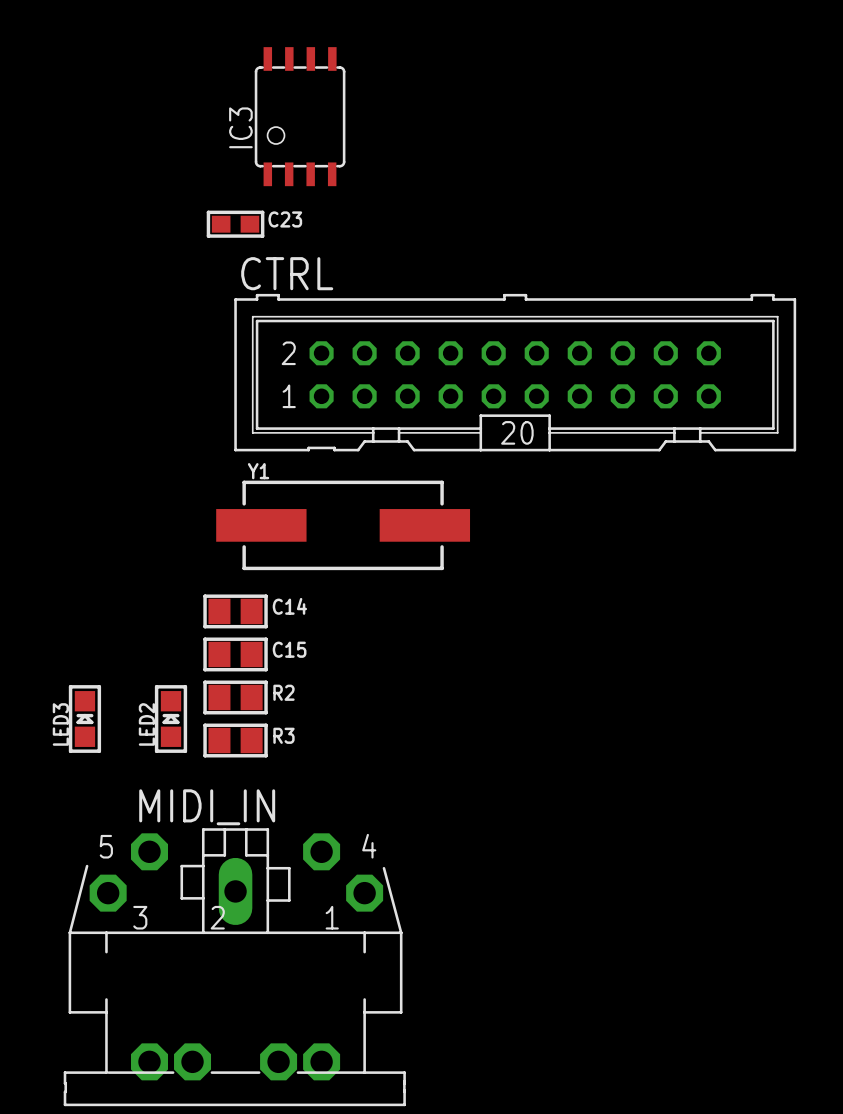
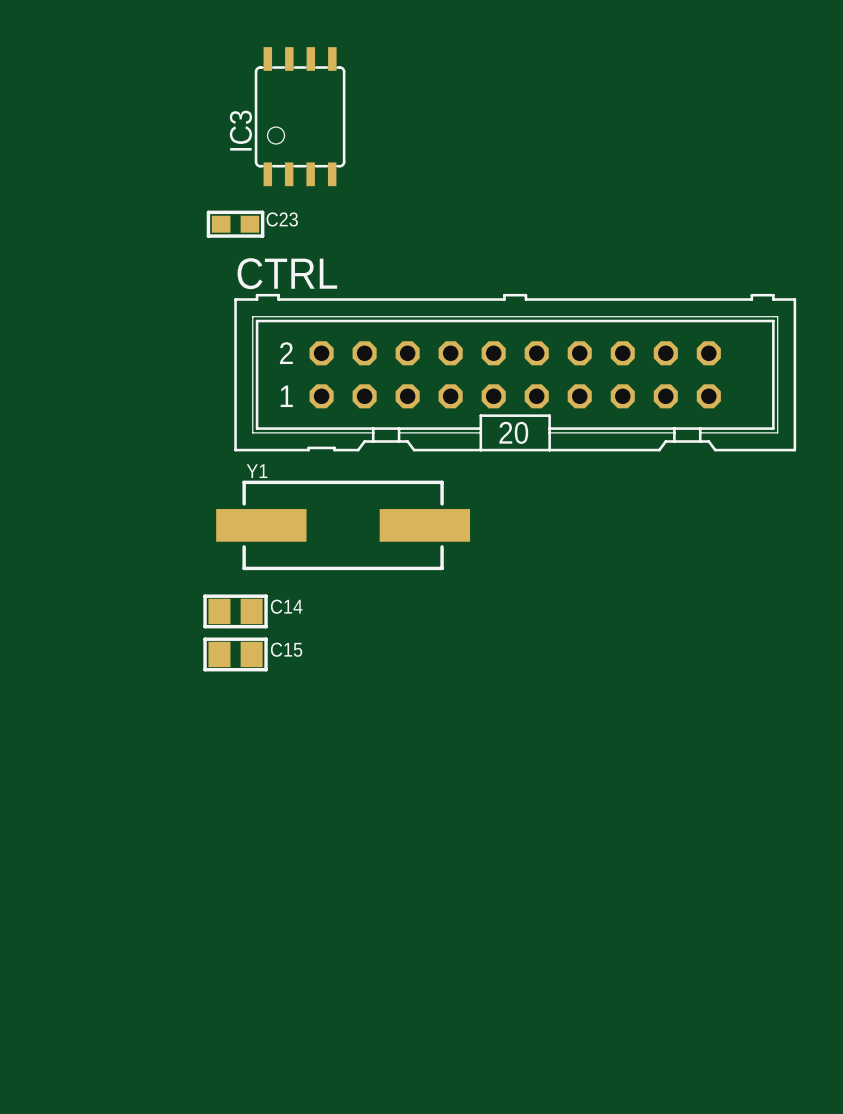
R2: (235, 697) -> none
LED3: (84, 719) -> none
LED2: (171, 719) -> none
R3: (235, 740) -> none
MIDI_IN: (234, 967) -> none

